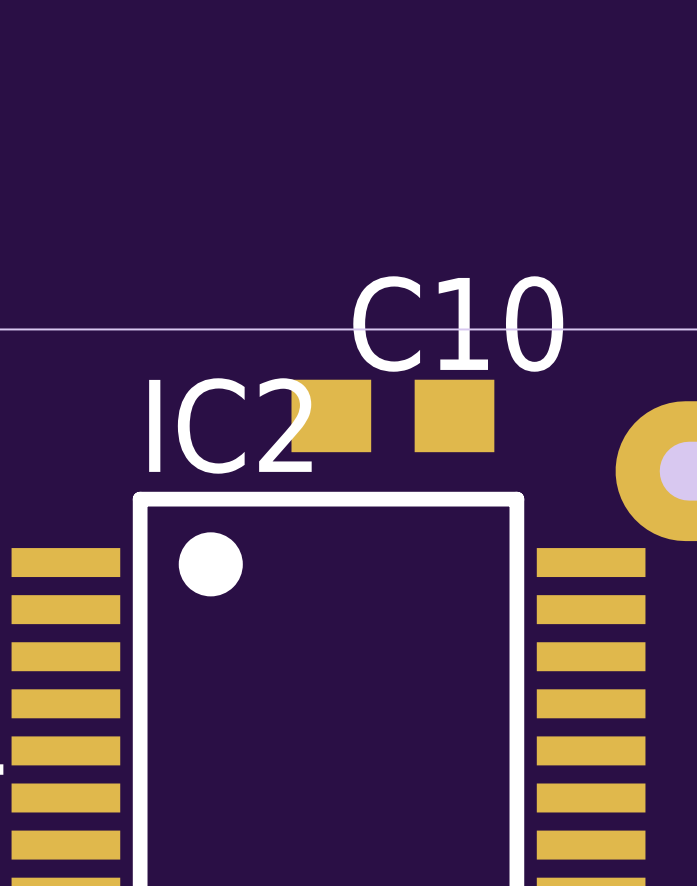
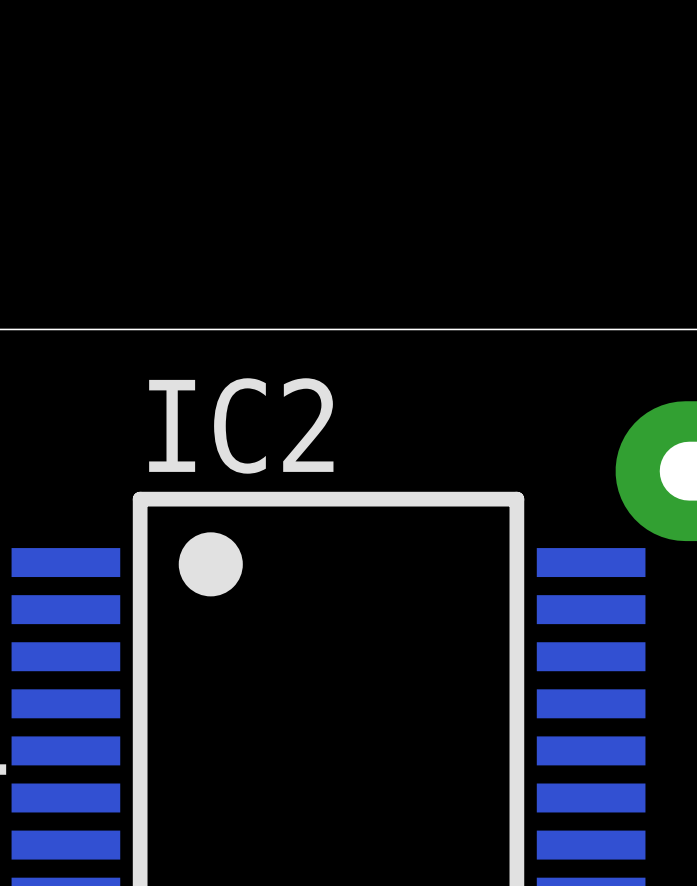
C10: (392, 415) -> none

